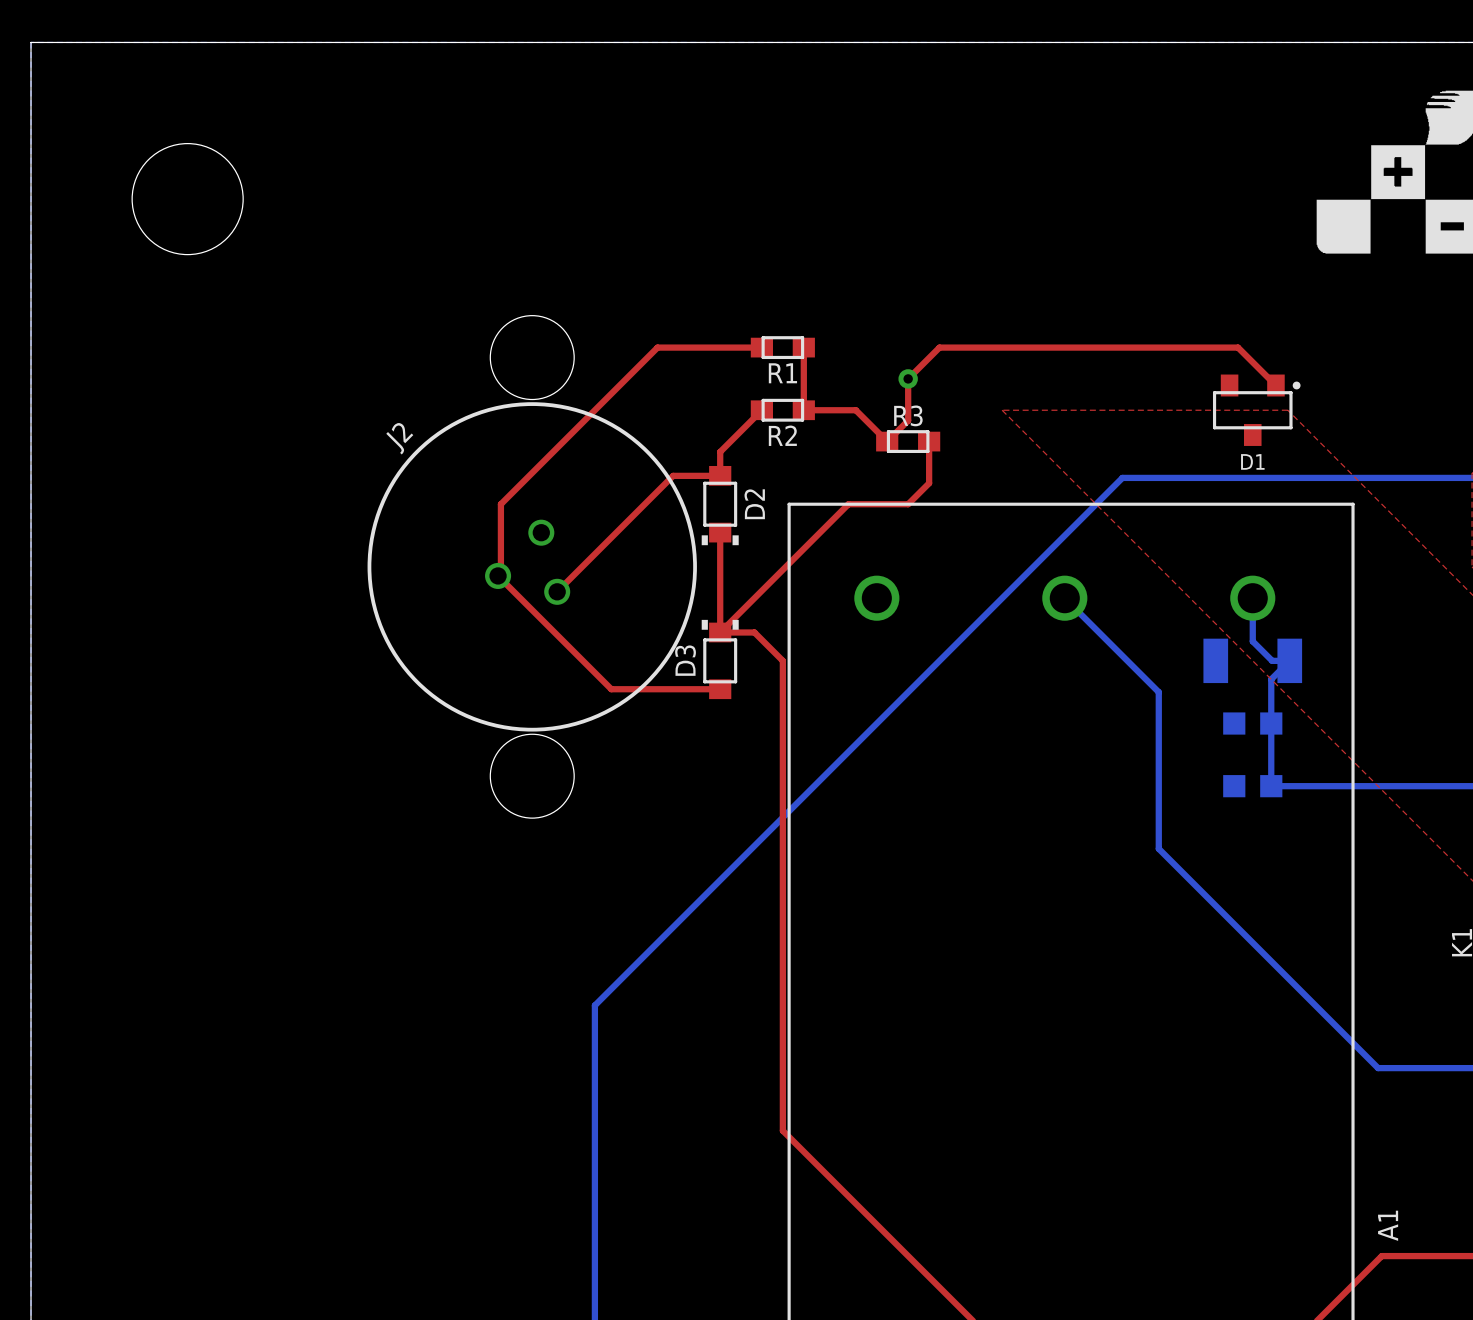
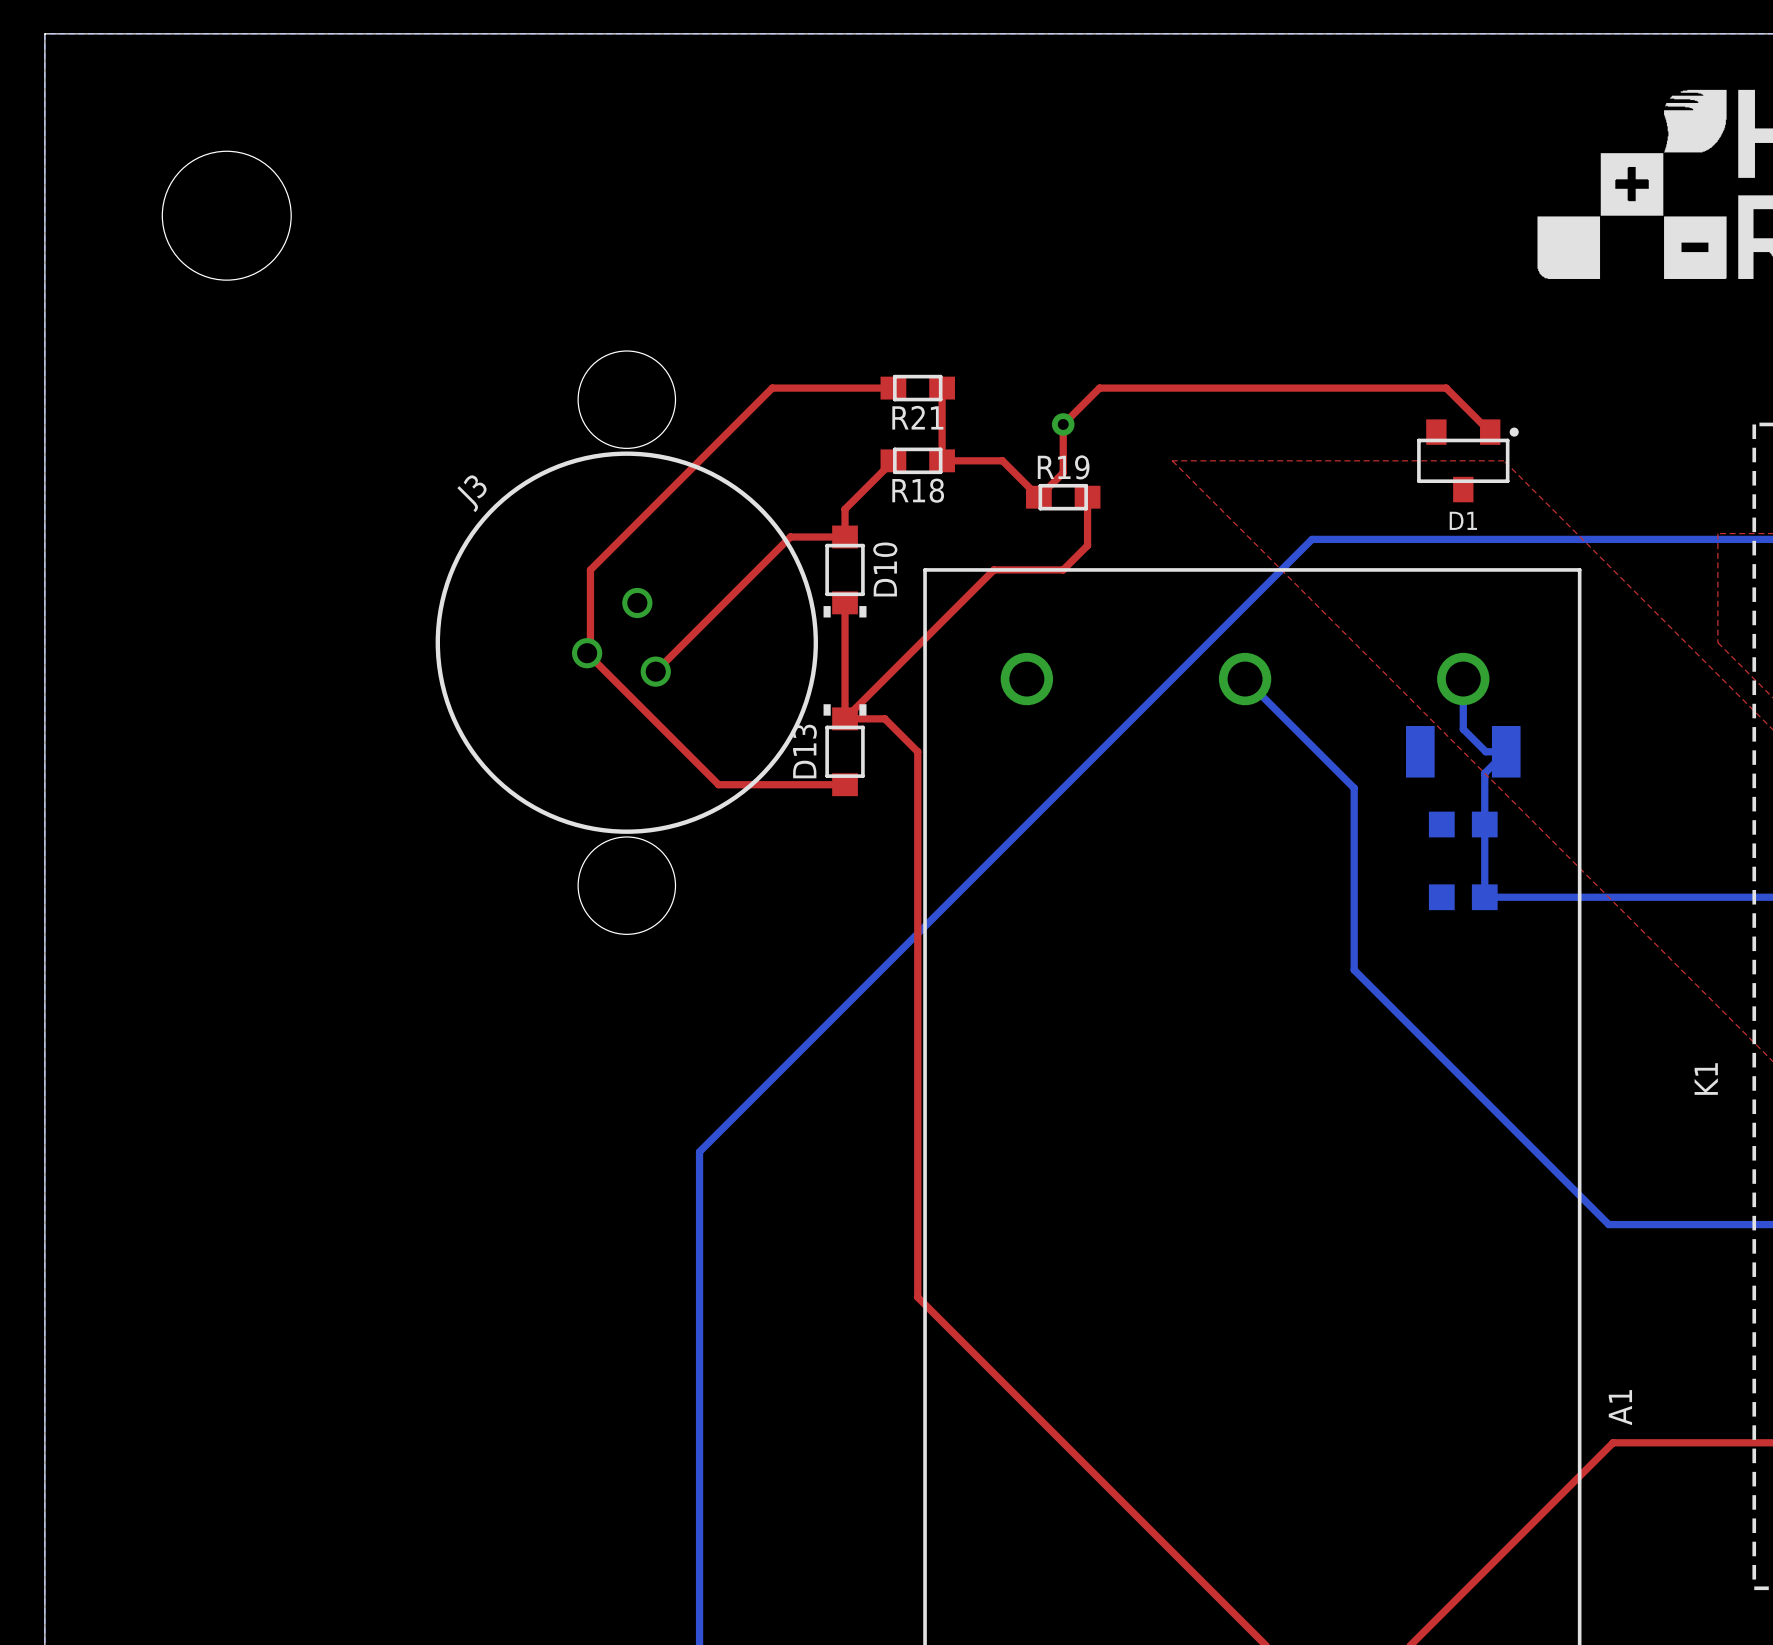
R1 name: R1 (782, 373) -> R21 (917, 417)
R3 name: R3 (908, 415) -> R19 (1063, 467)
R2 name: R2 (782, 435) -> R18 (918, 490)
J2 name: J2 (399, 438) -> J3 (472, 493)
D2 name: D2 (754, 504) -> D10 (885, 569)
D3 name: D3 (685, 660) -> D13 (804, 751)

